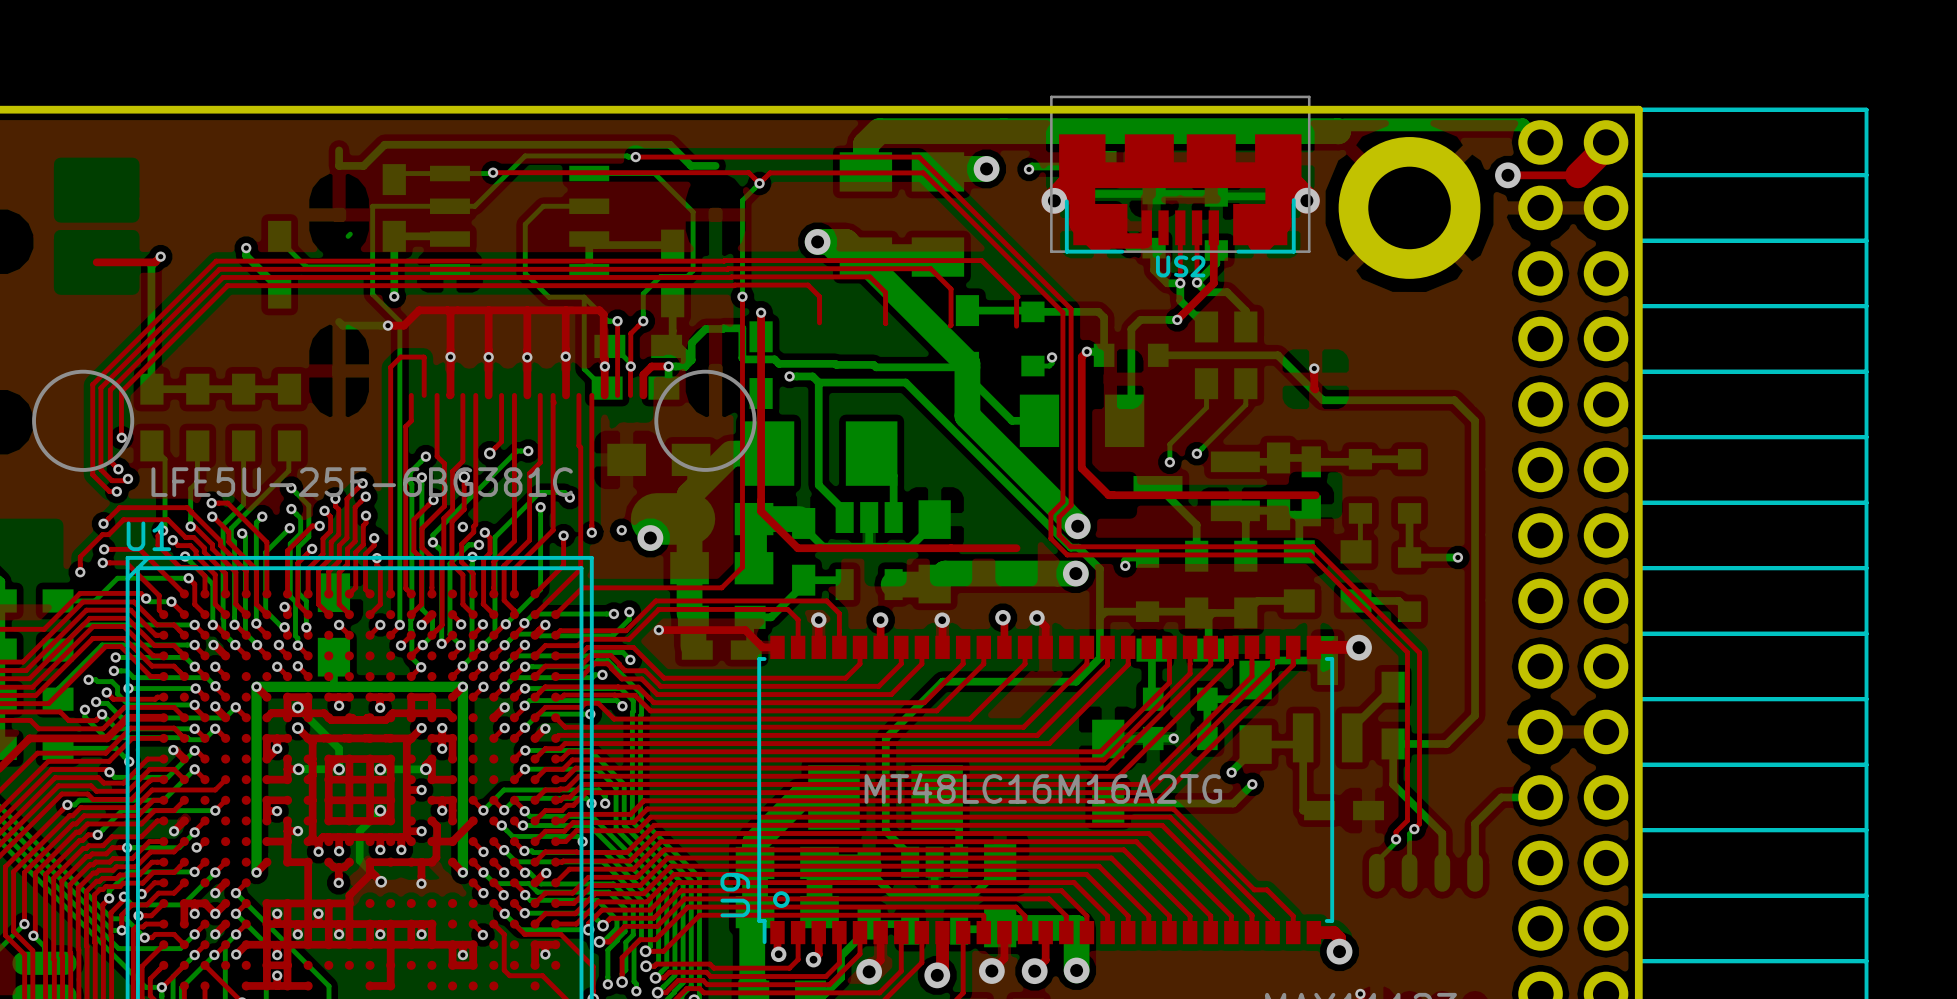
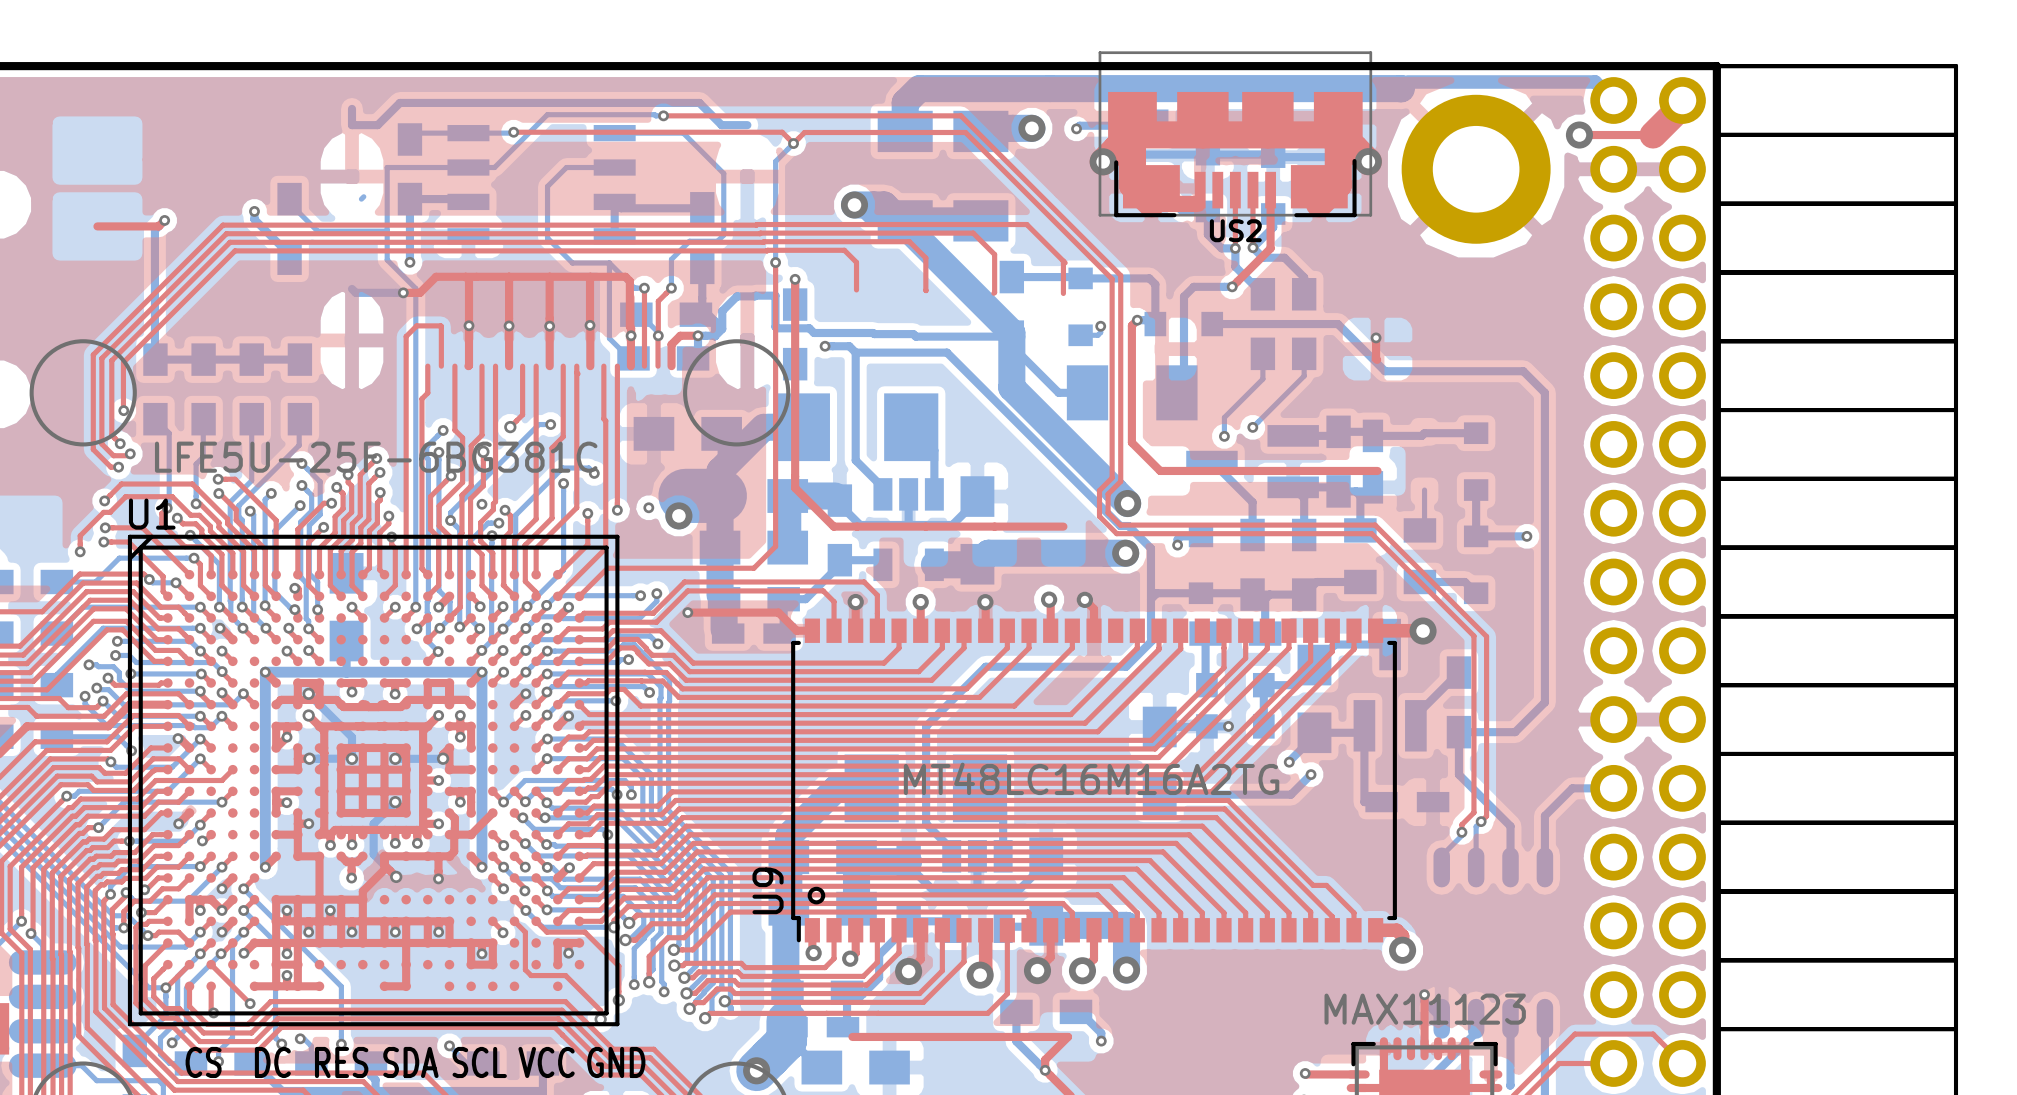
part: (1360, 486) -> none

